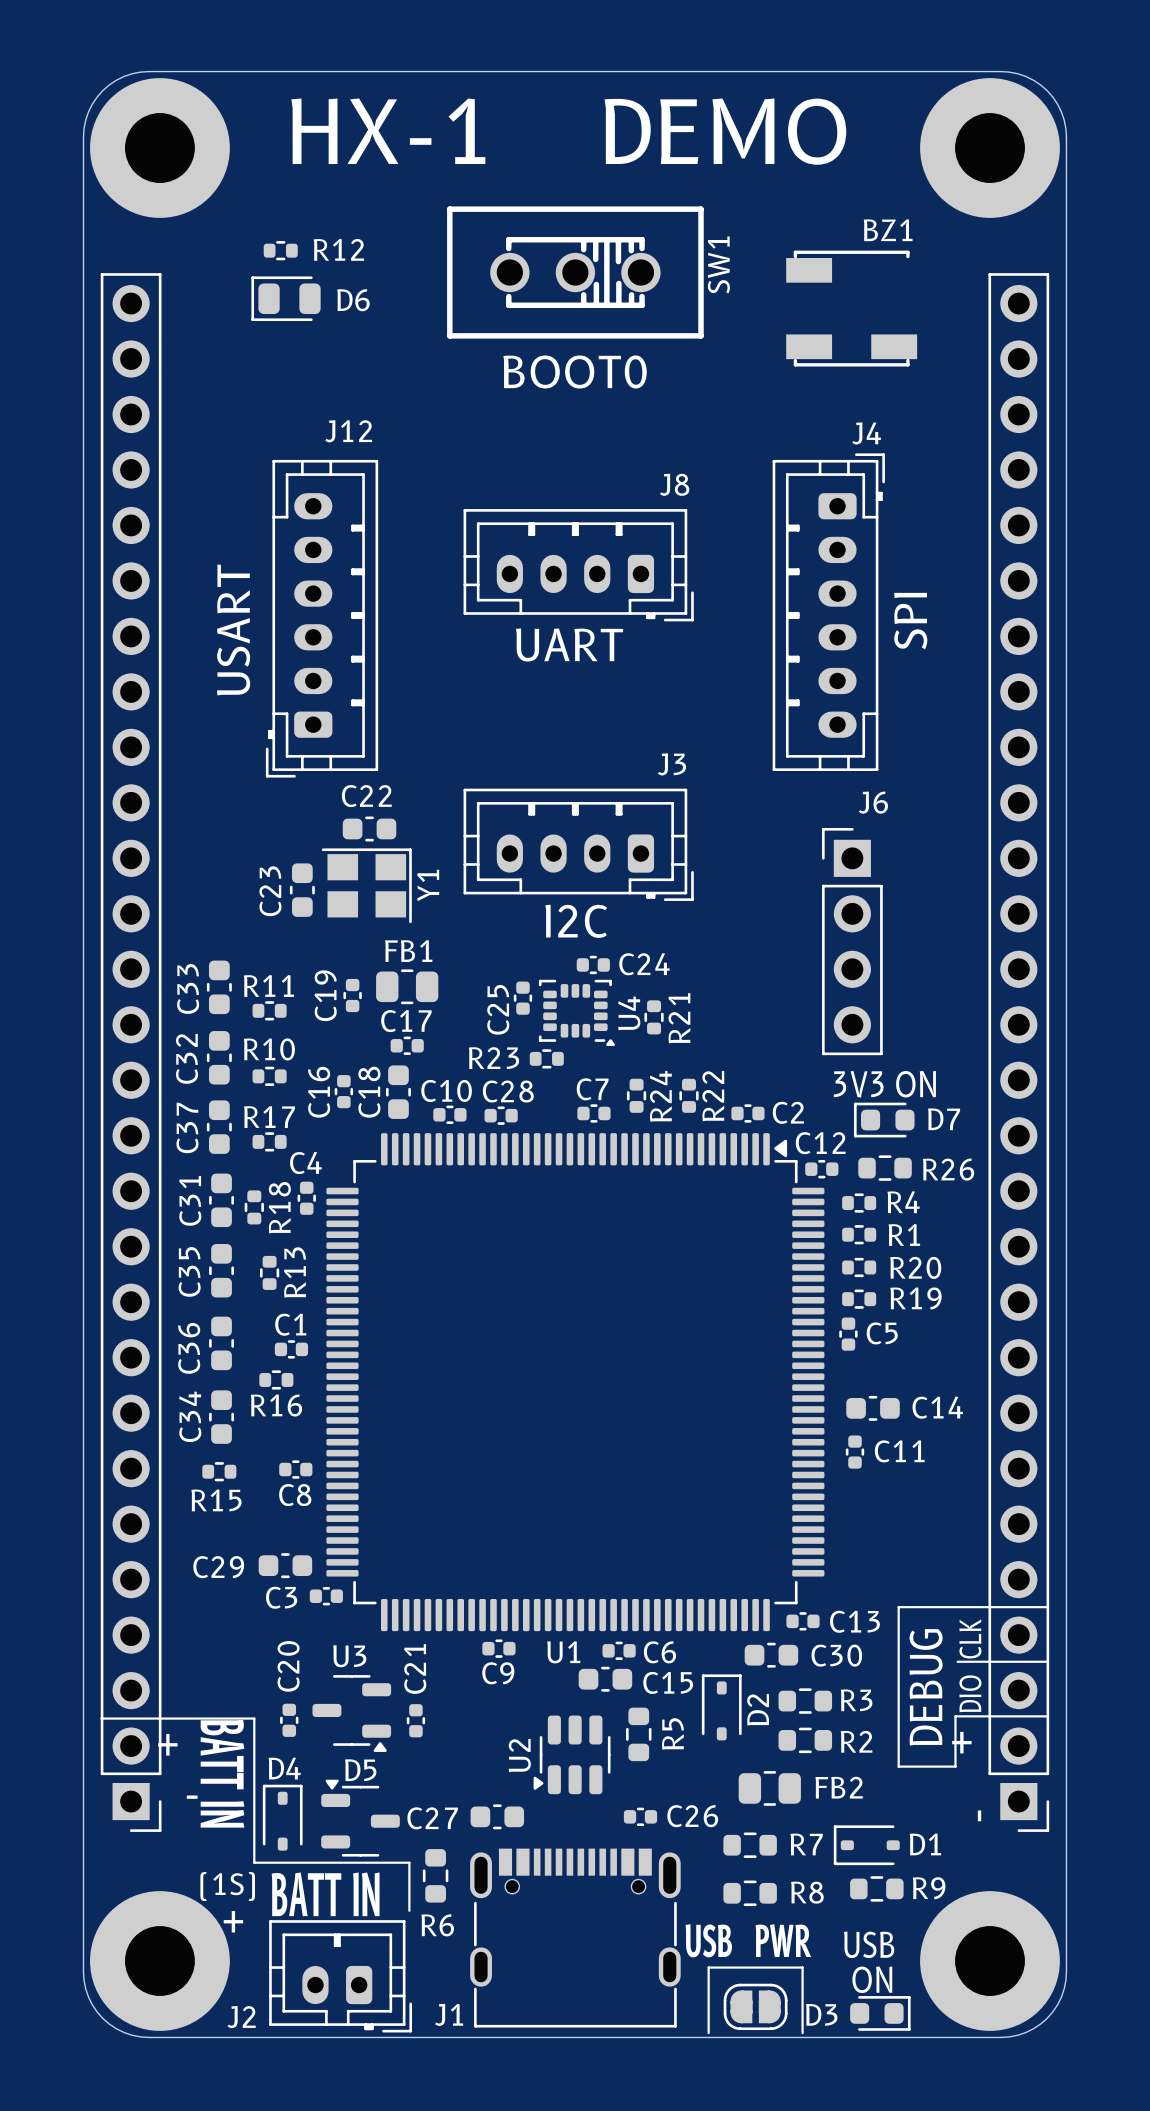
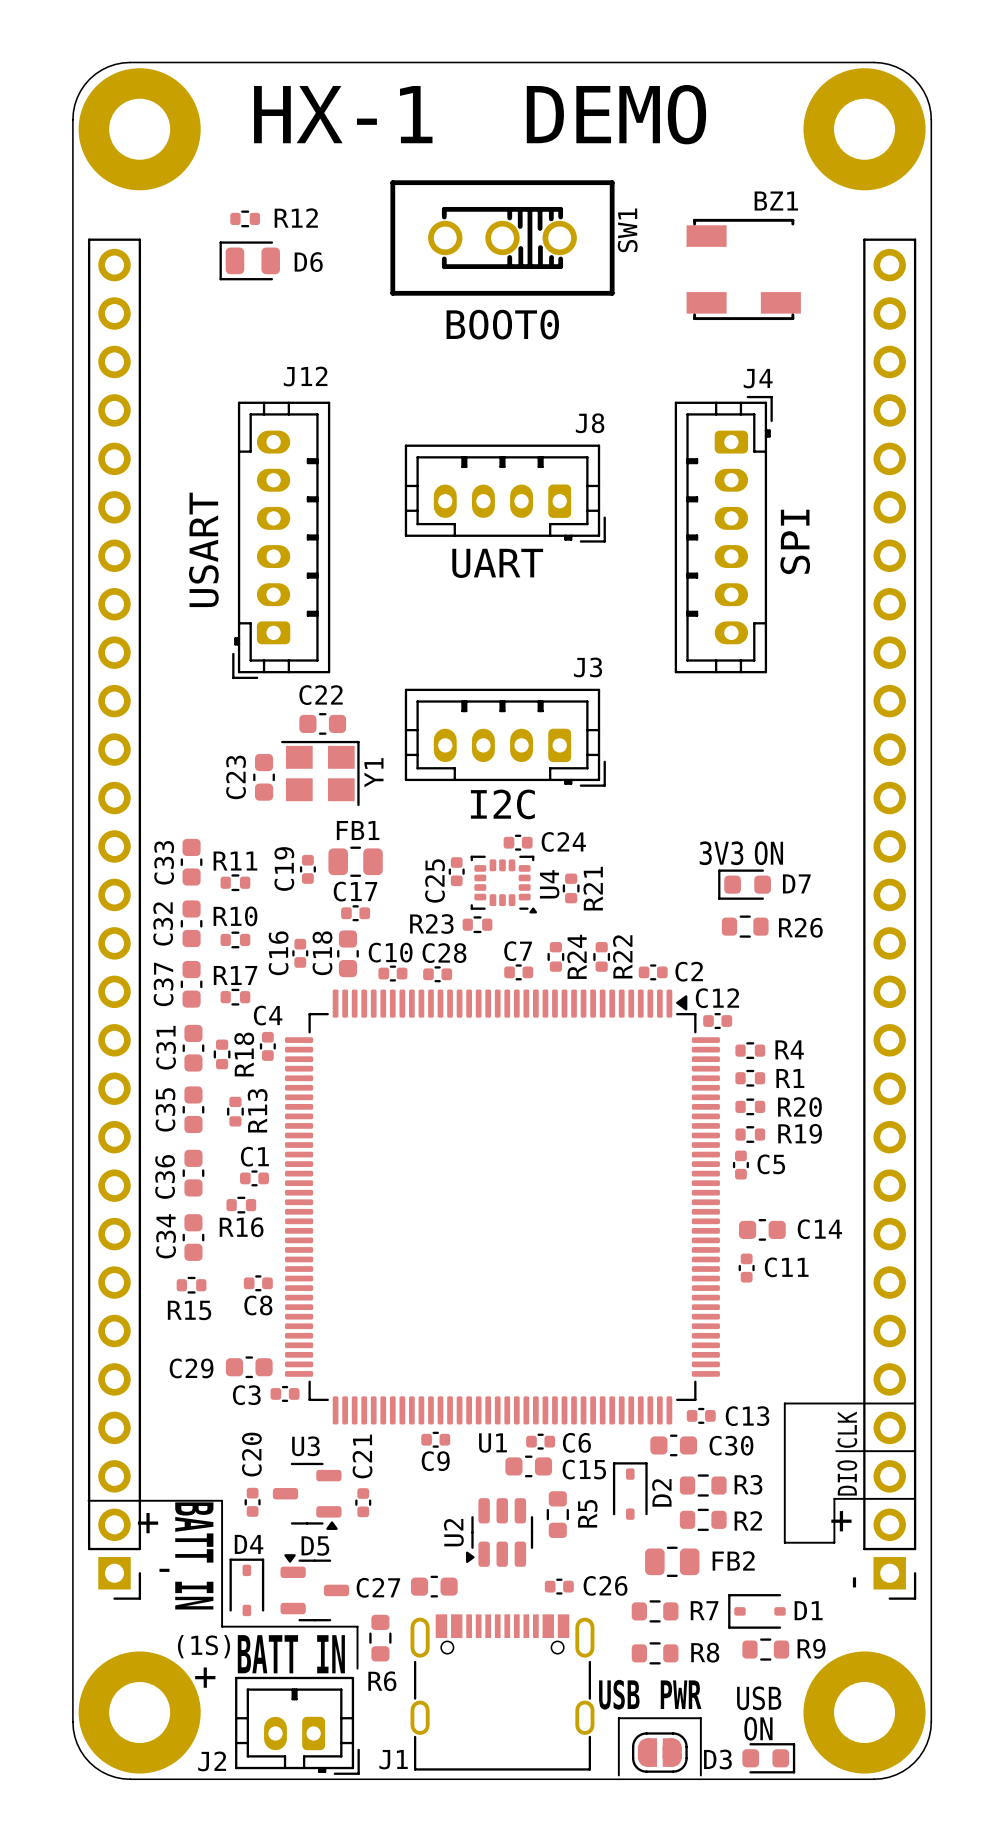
J6: DEBUG (852, 941) -> none
text position: 3V3 (858, 1084) -> 3V3 (721, 853)
text position: ON (916, 1084) -> ON (768, 853)
D7 position: (884, 1120) -> (744, 884)
R26 position: (885, 1168) -> (745, 926)

